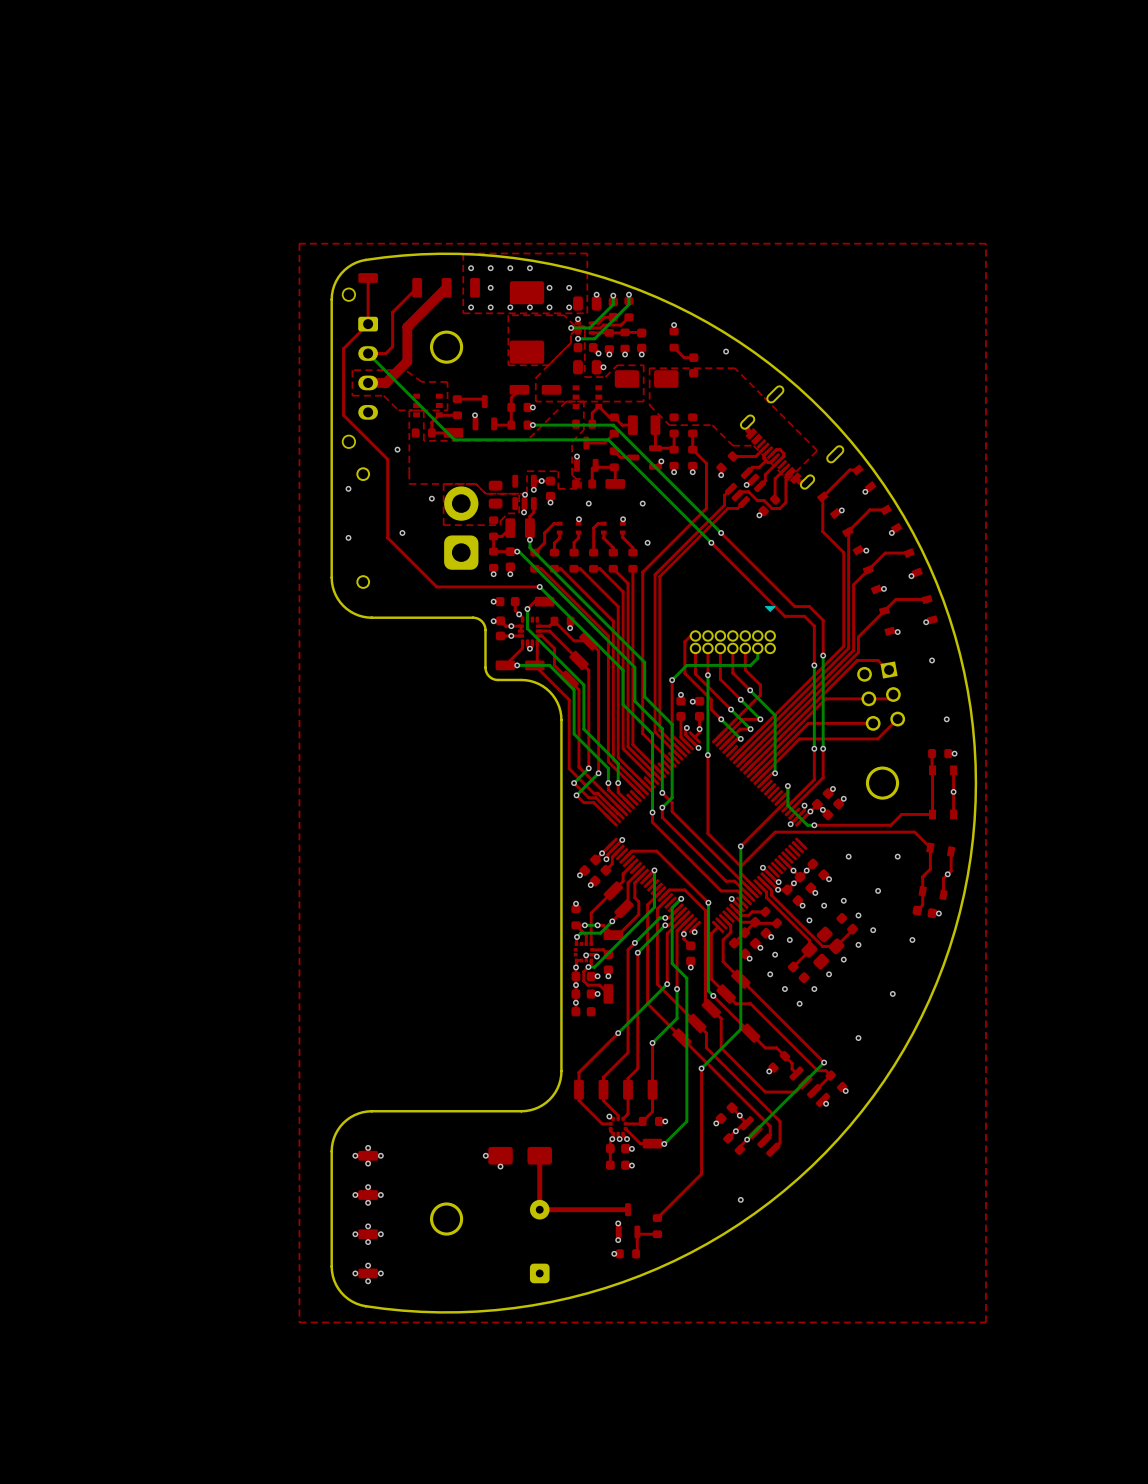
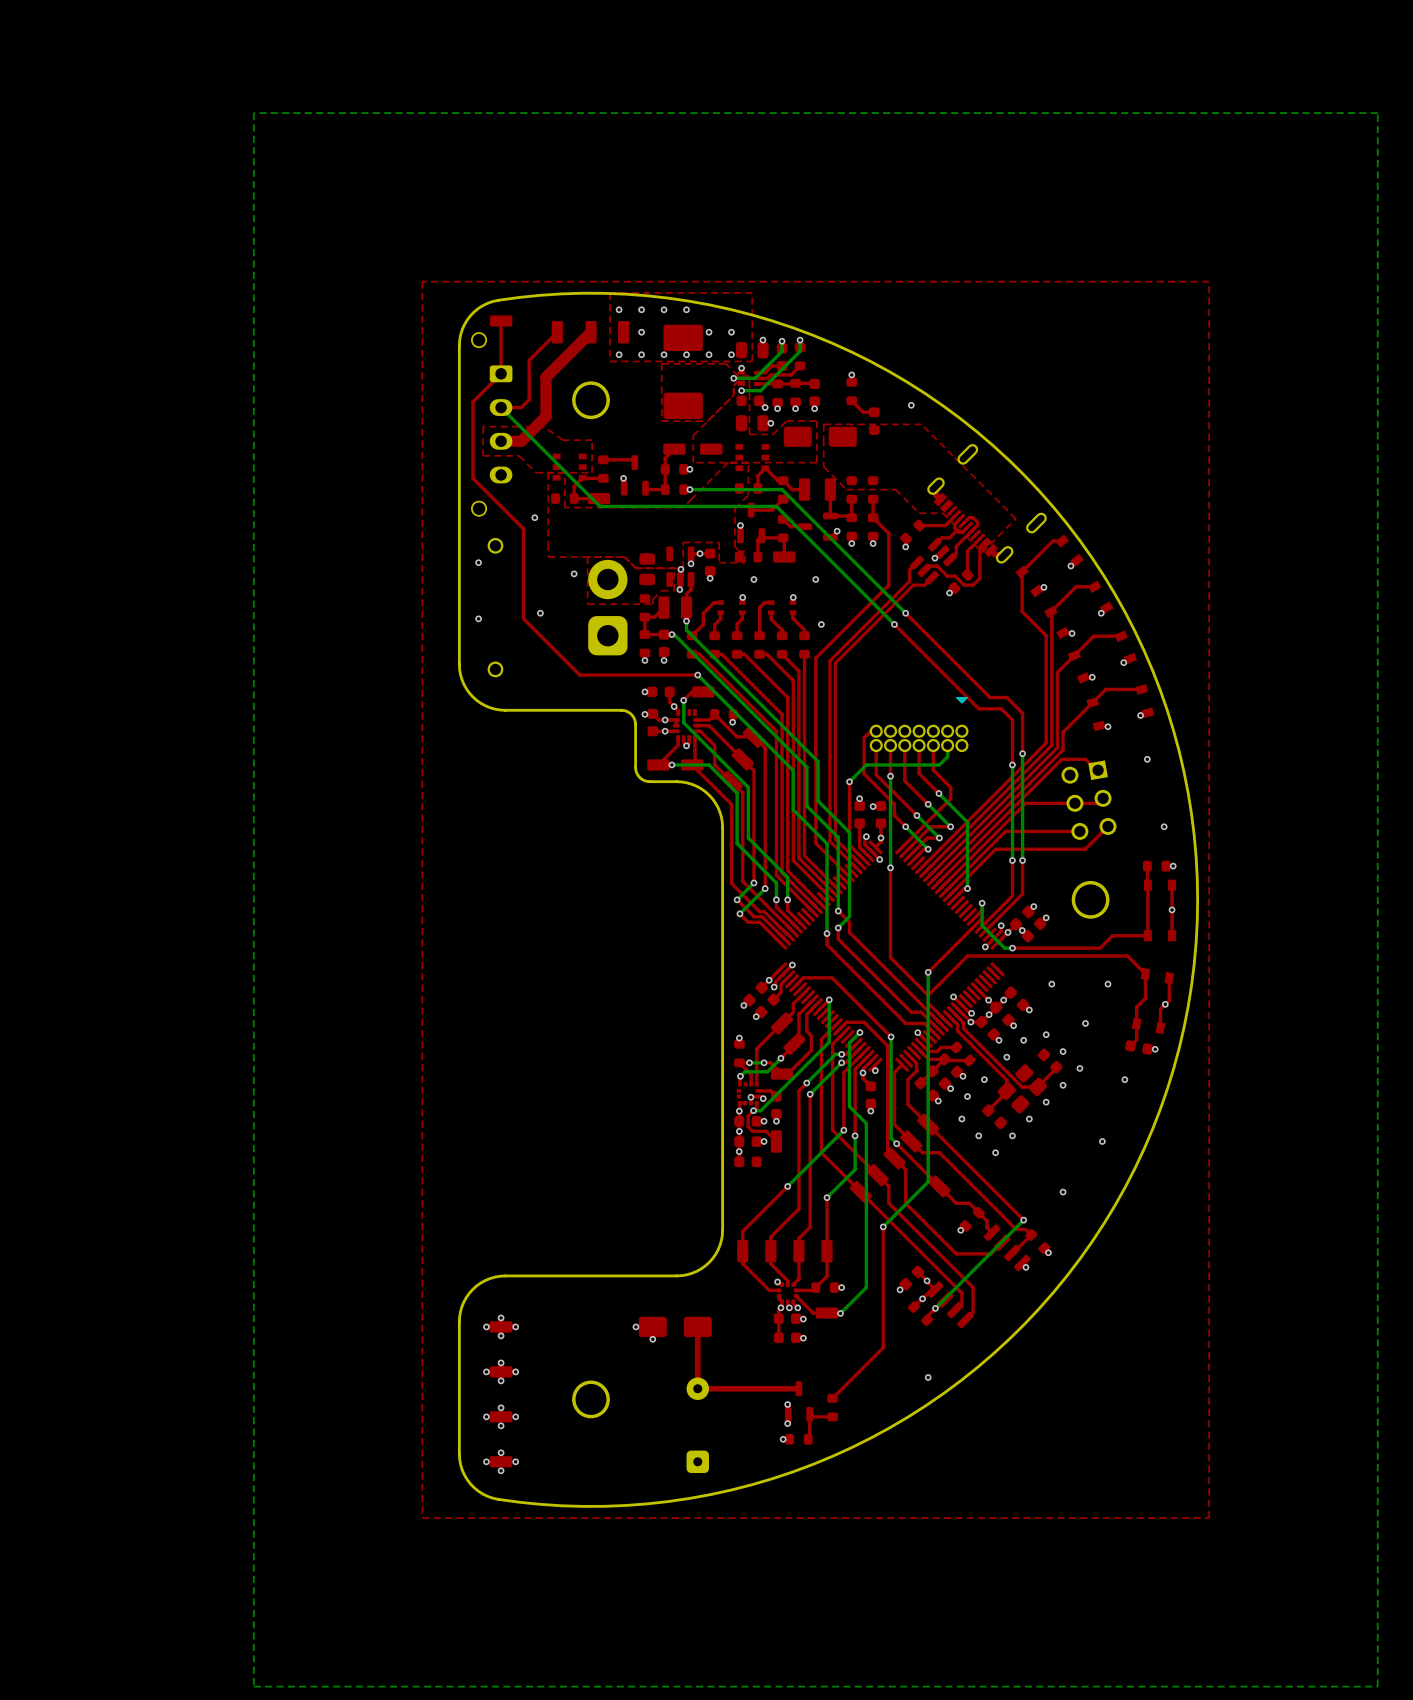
bottom zone outline: none -> (1377, 113) (253, 113) (253, 1686) (1377, 1686) (1377, 113)

